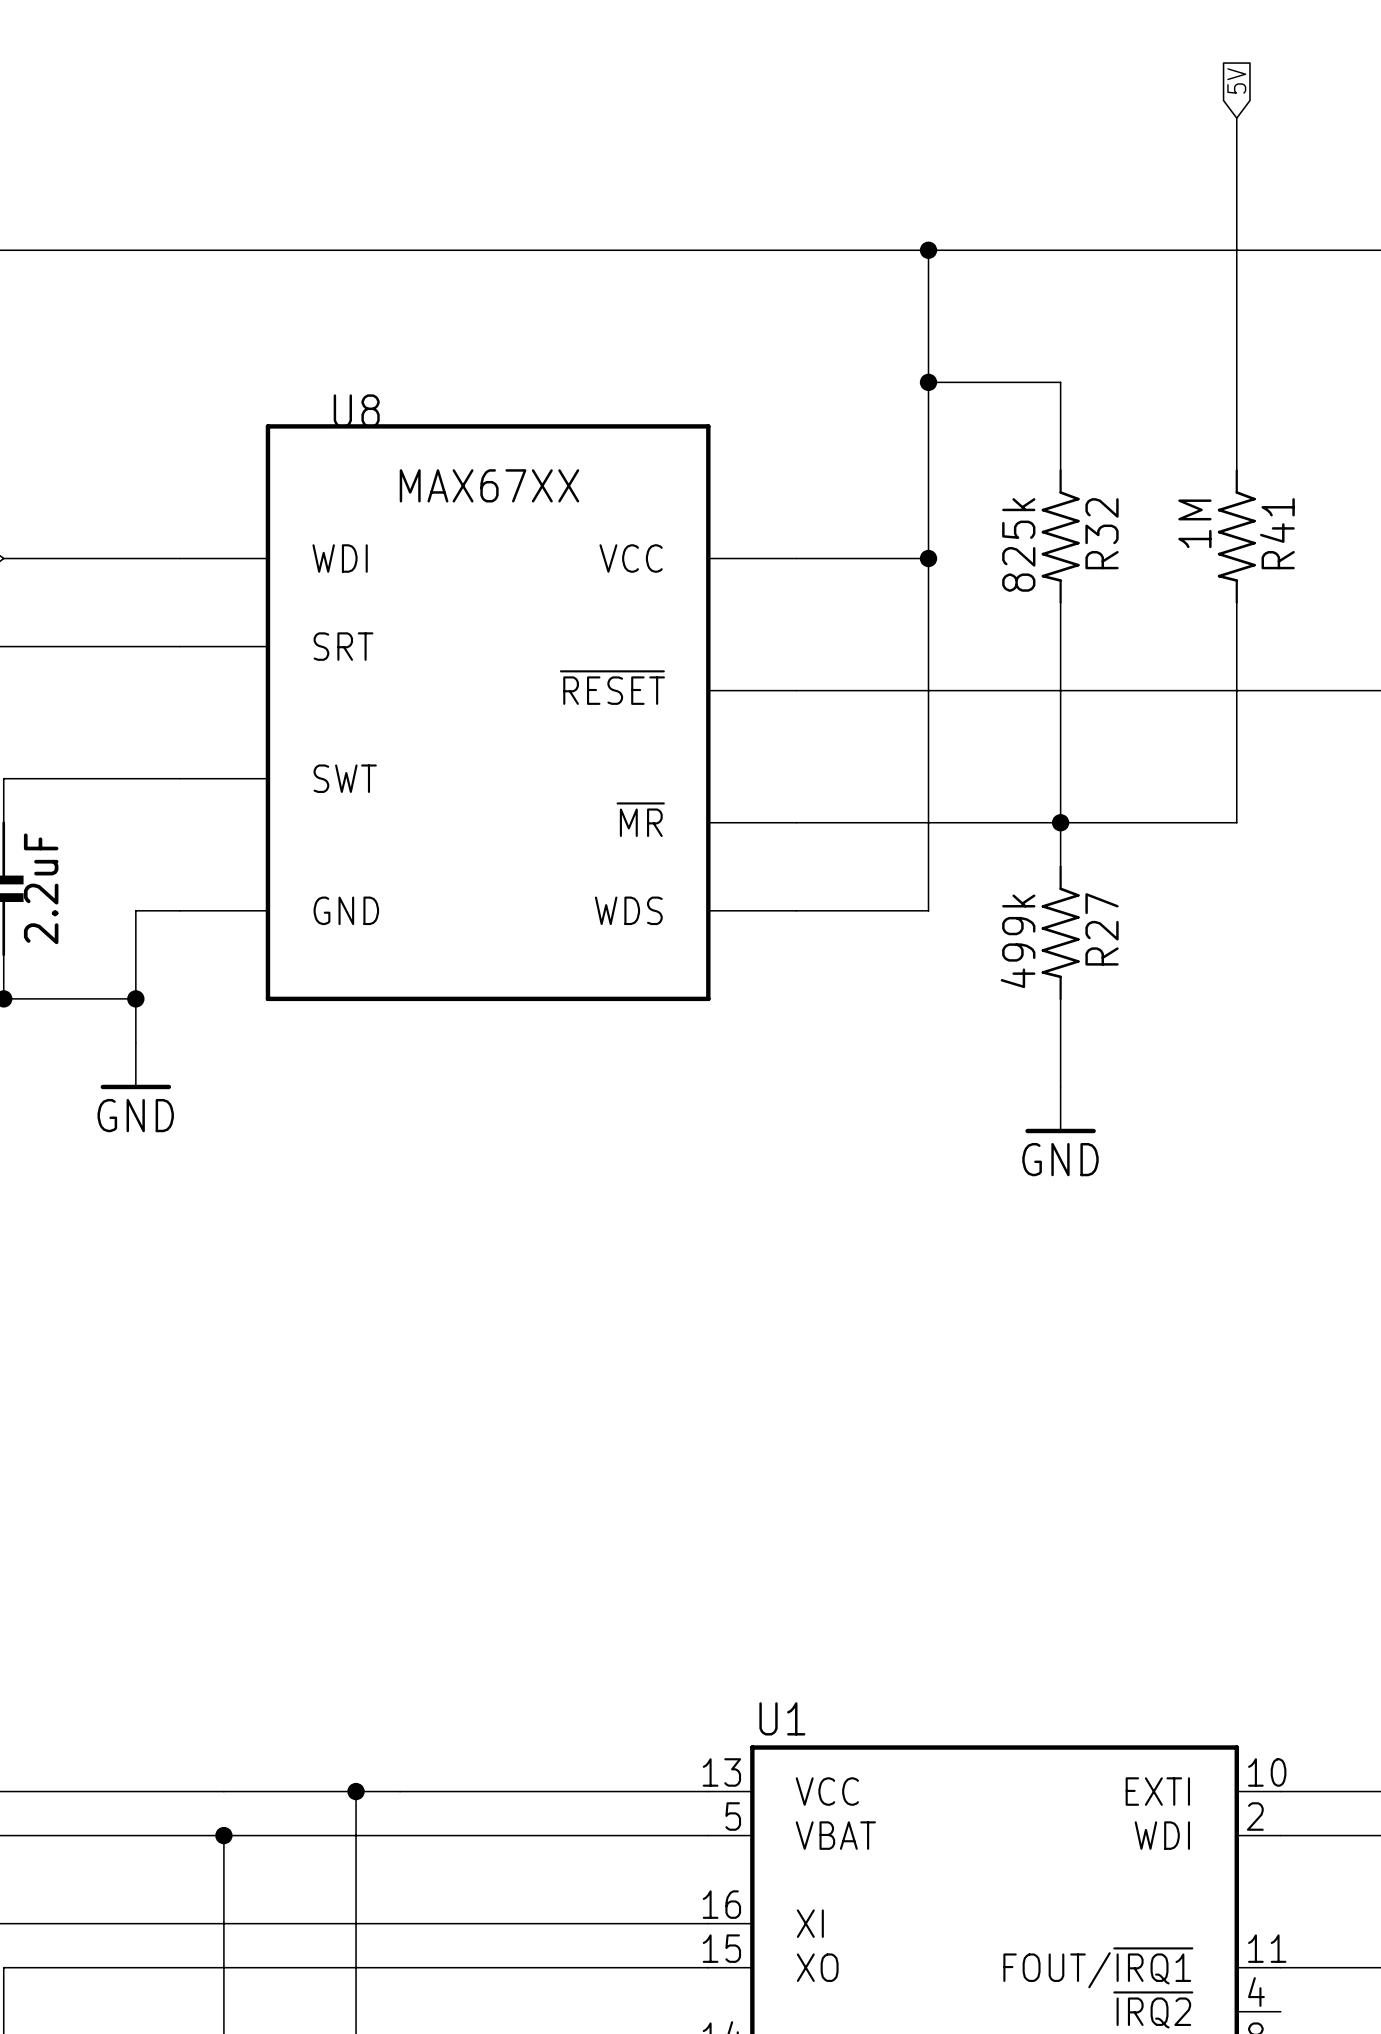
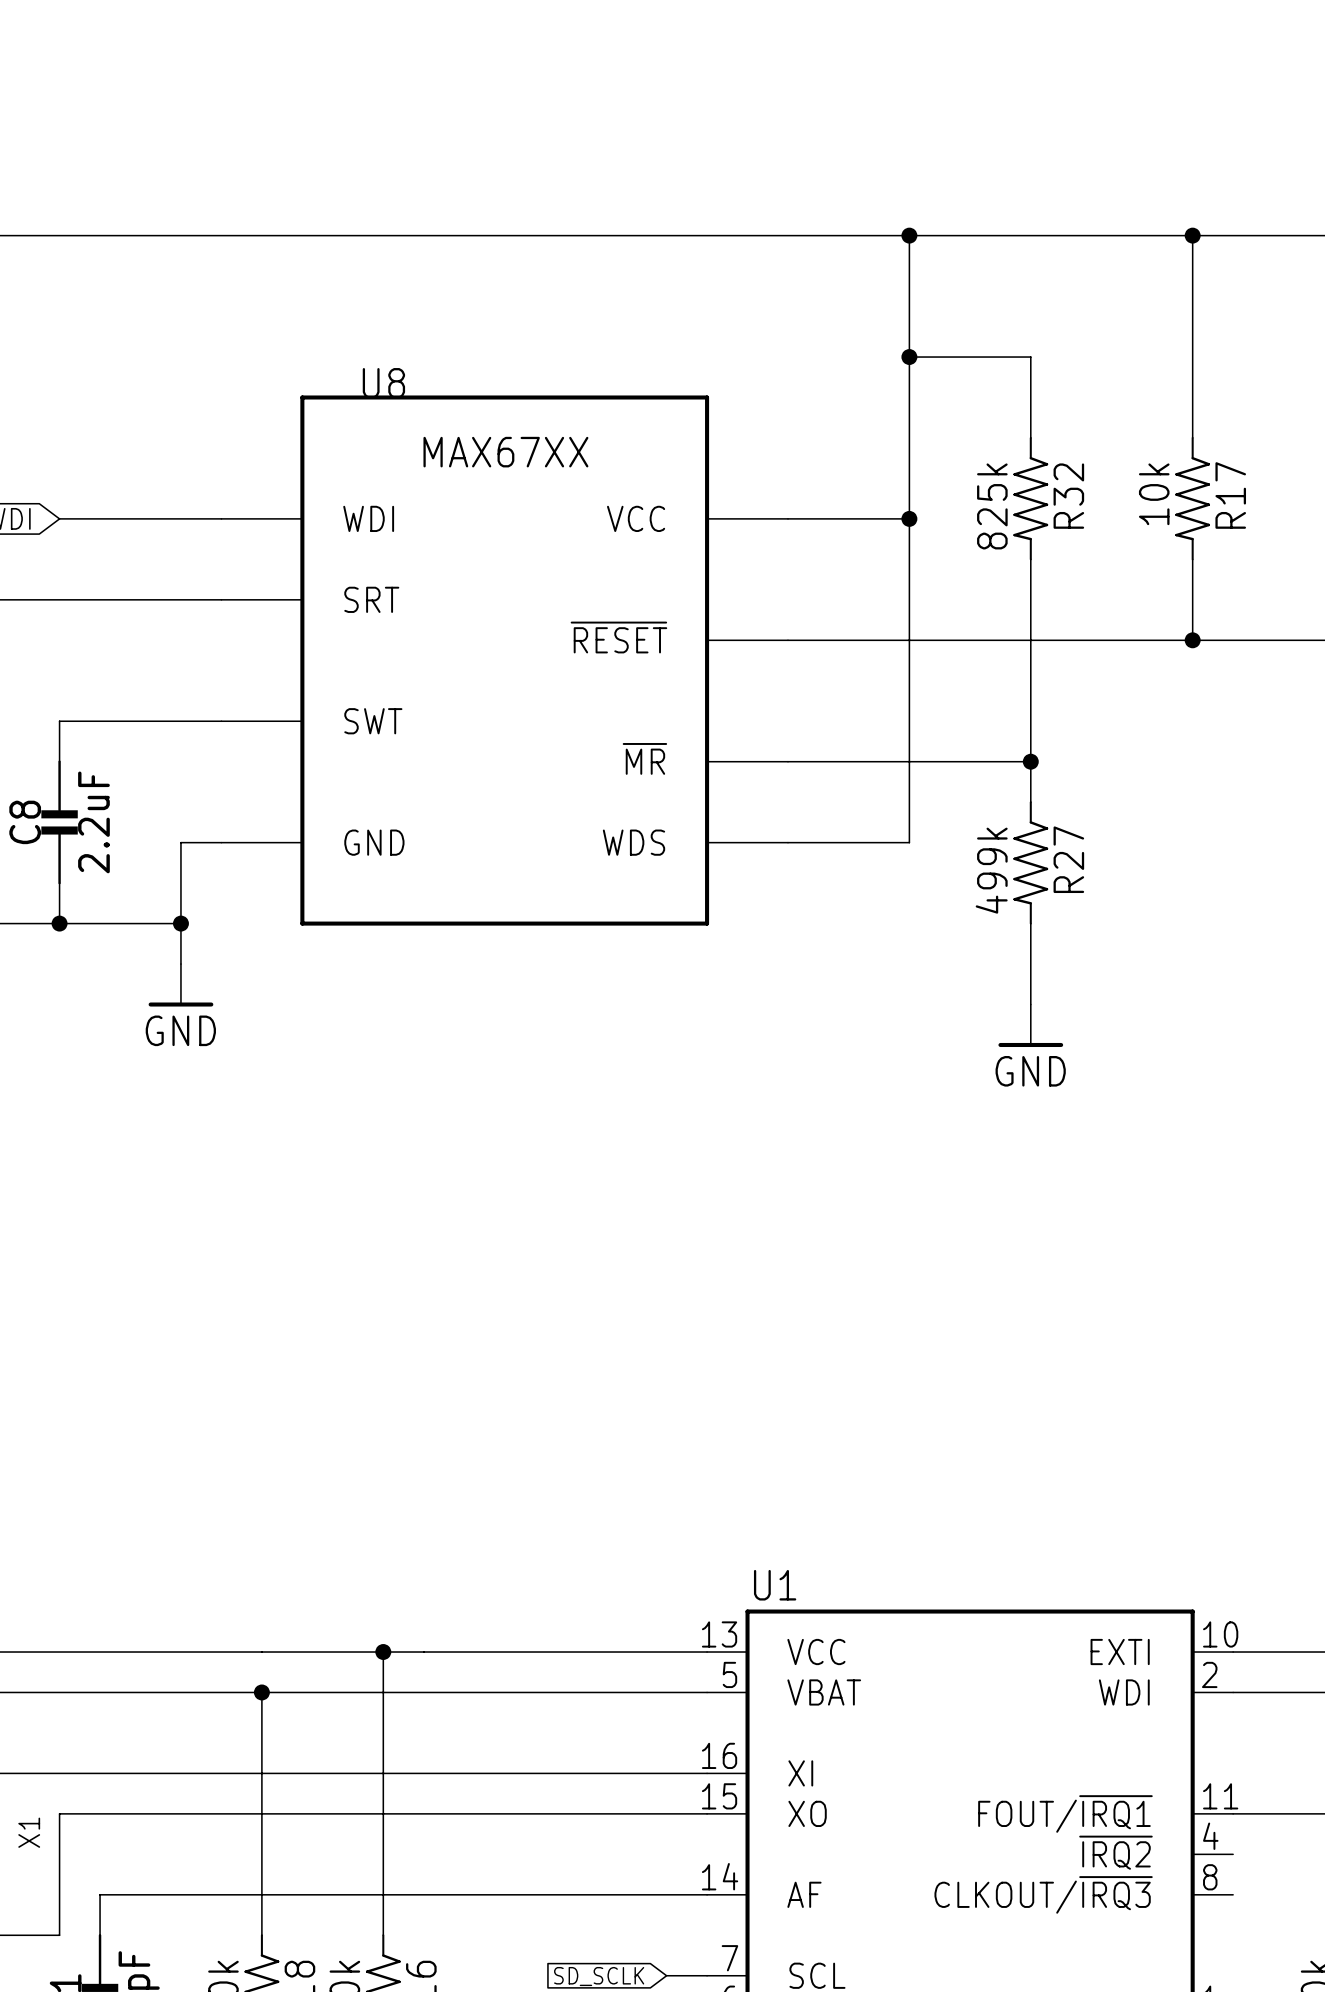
global label: 5V (1236, 80) -> none
wire: (1236, 118) (1236, 250) -> none
junction: none -> (1192, 235)
R41 value: 1M (1194, 523) -> 10k (1154, 494)
R41 name: R41 (1277, 533) -> R17 (1230, 495)
wire: (1236, 690) (1236, 822) (1060, 822) -> none
junction: none -> (1192, 640)

